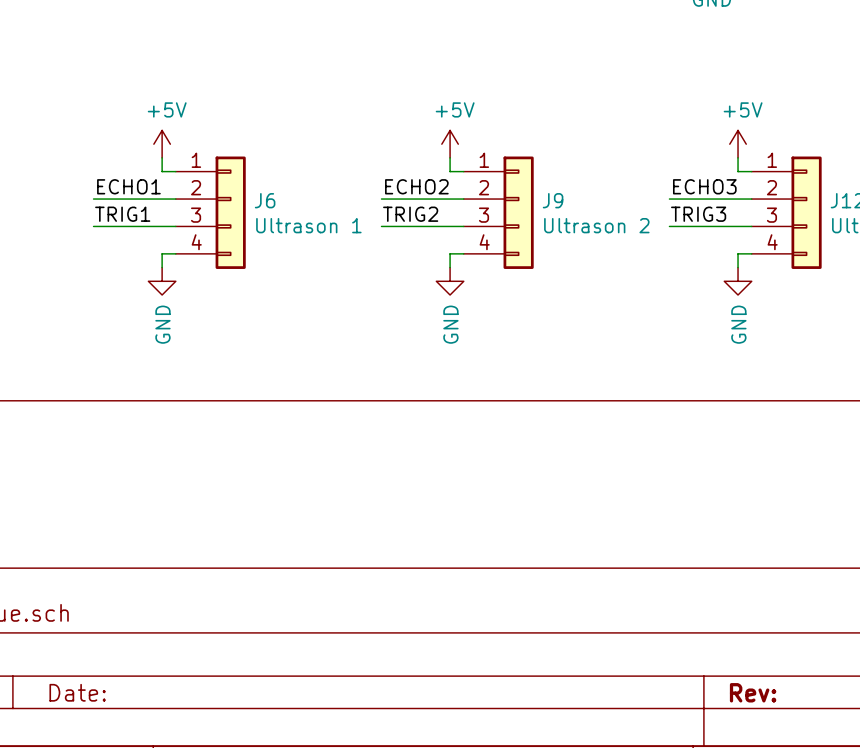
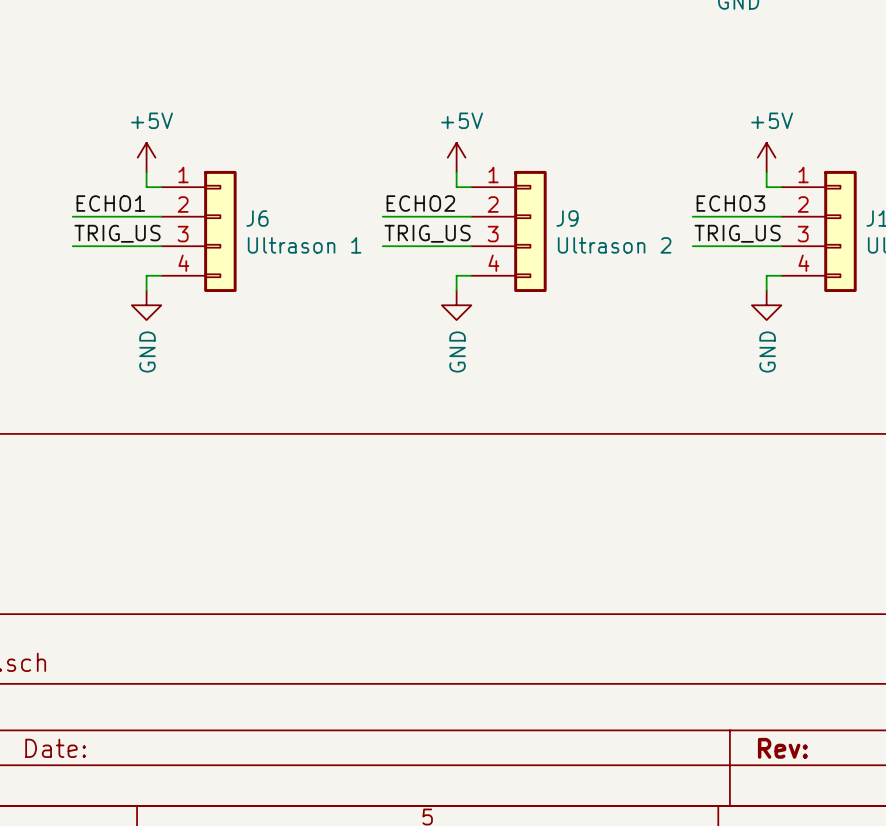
label: TRIG1 (122, 214) -> TRIG_US (117, 233)
label: TRIG2 (410, 214) -> TRIG_US (427, 233)
label: TRIG3 (698, 214) -> TRIG_US (737, 233)

